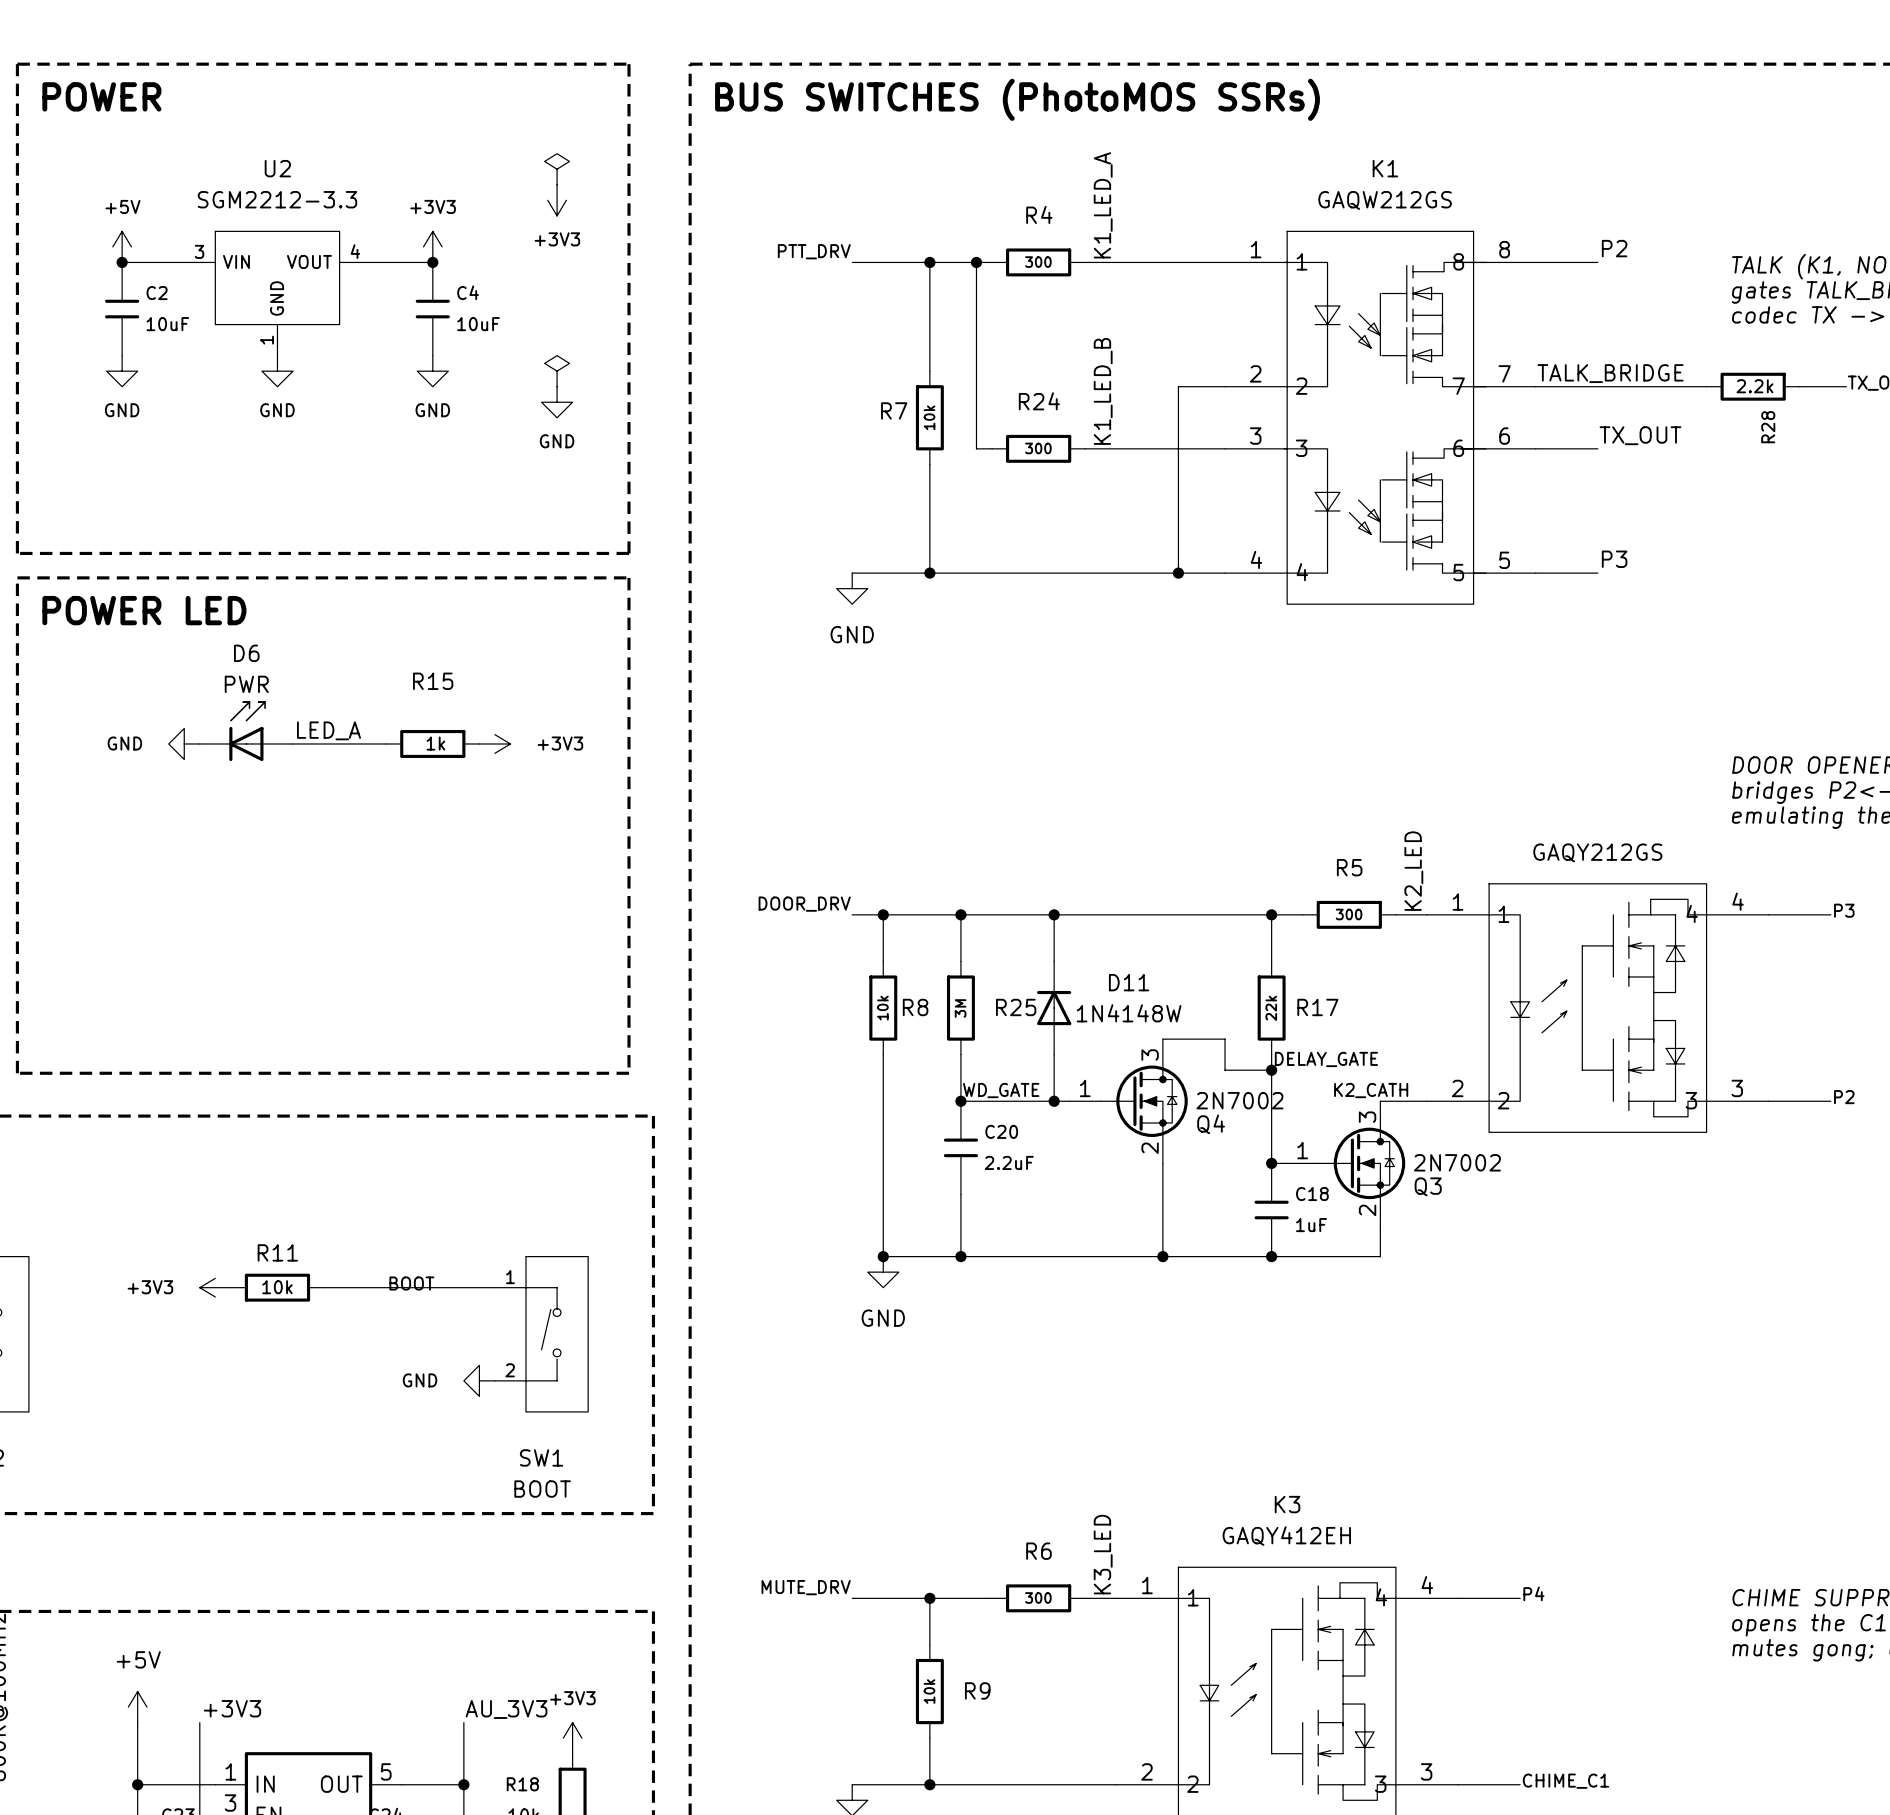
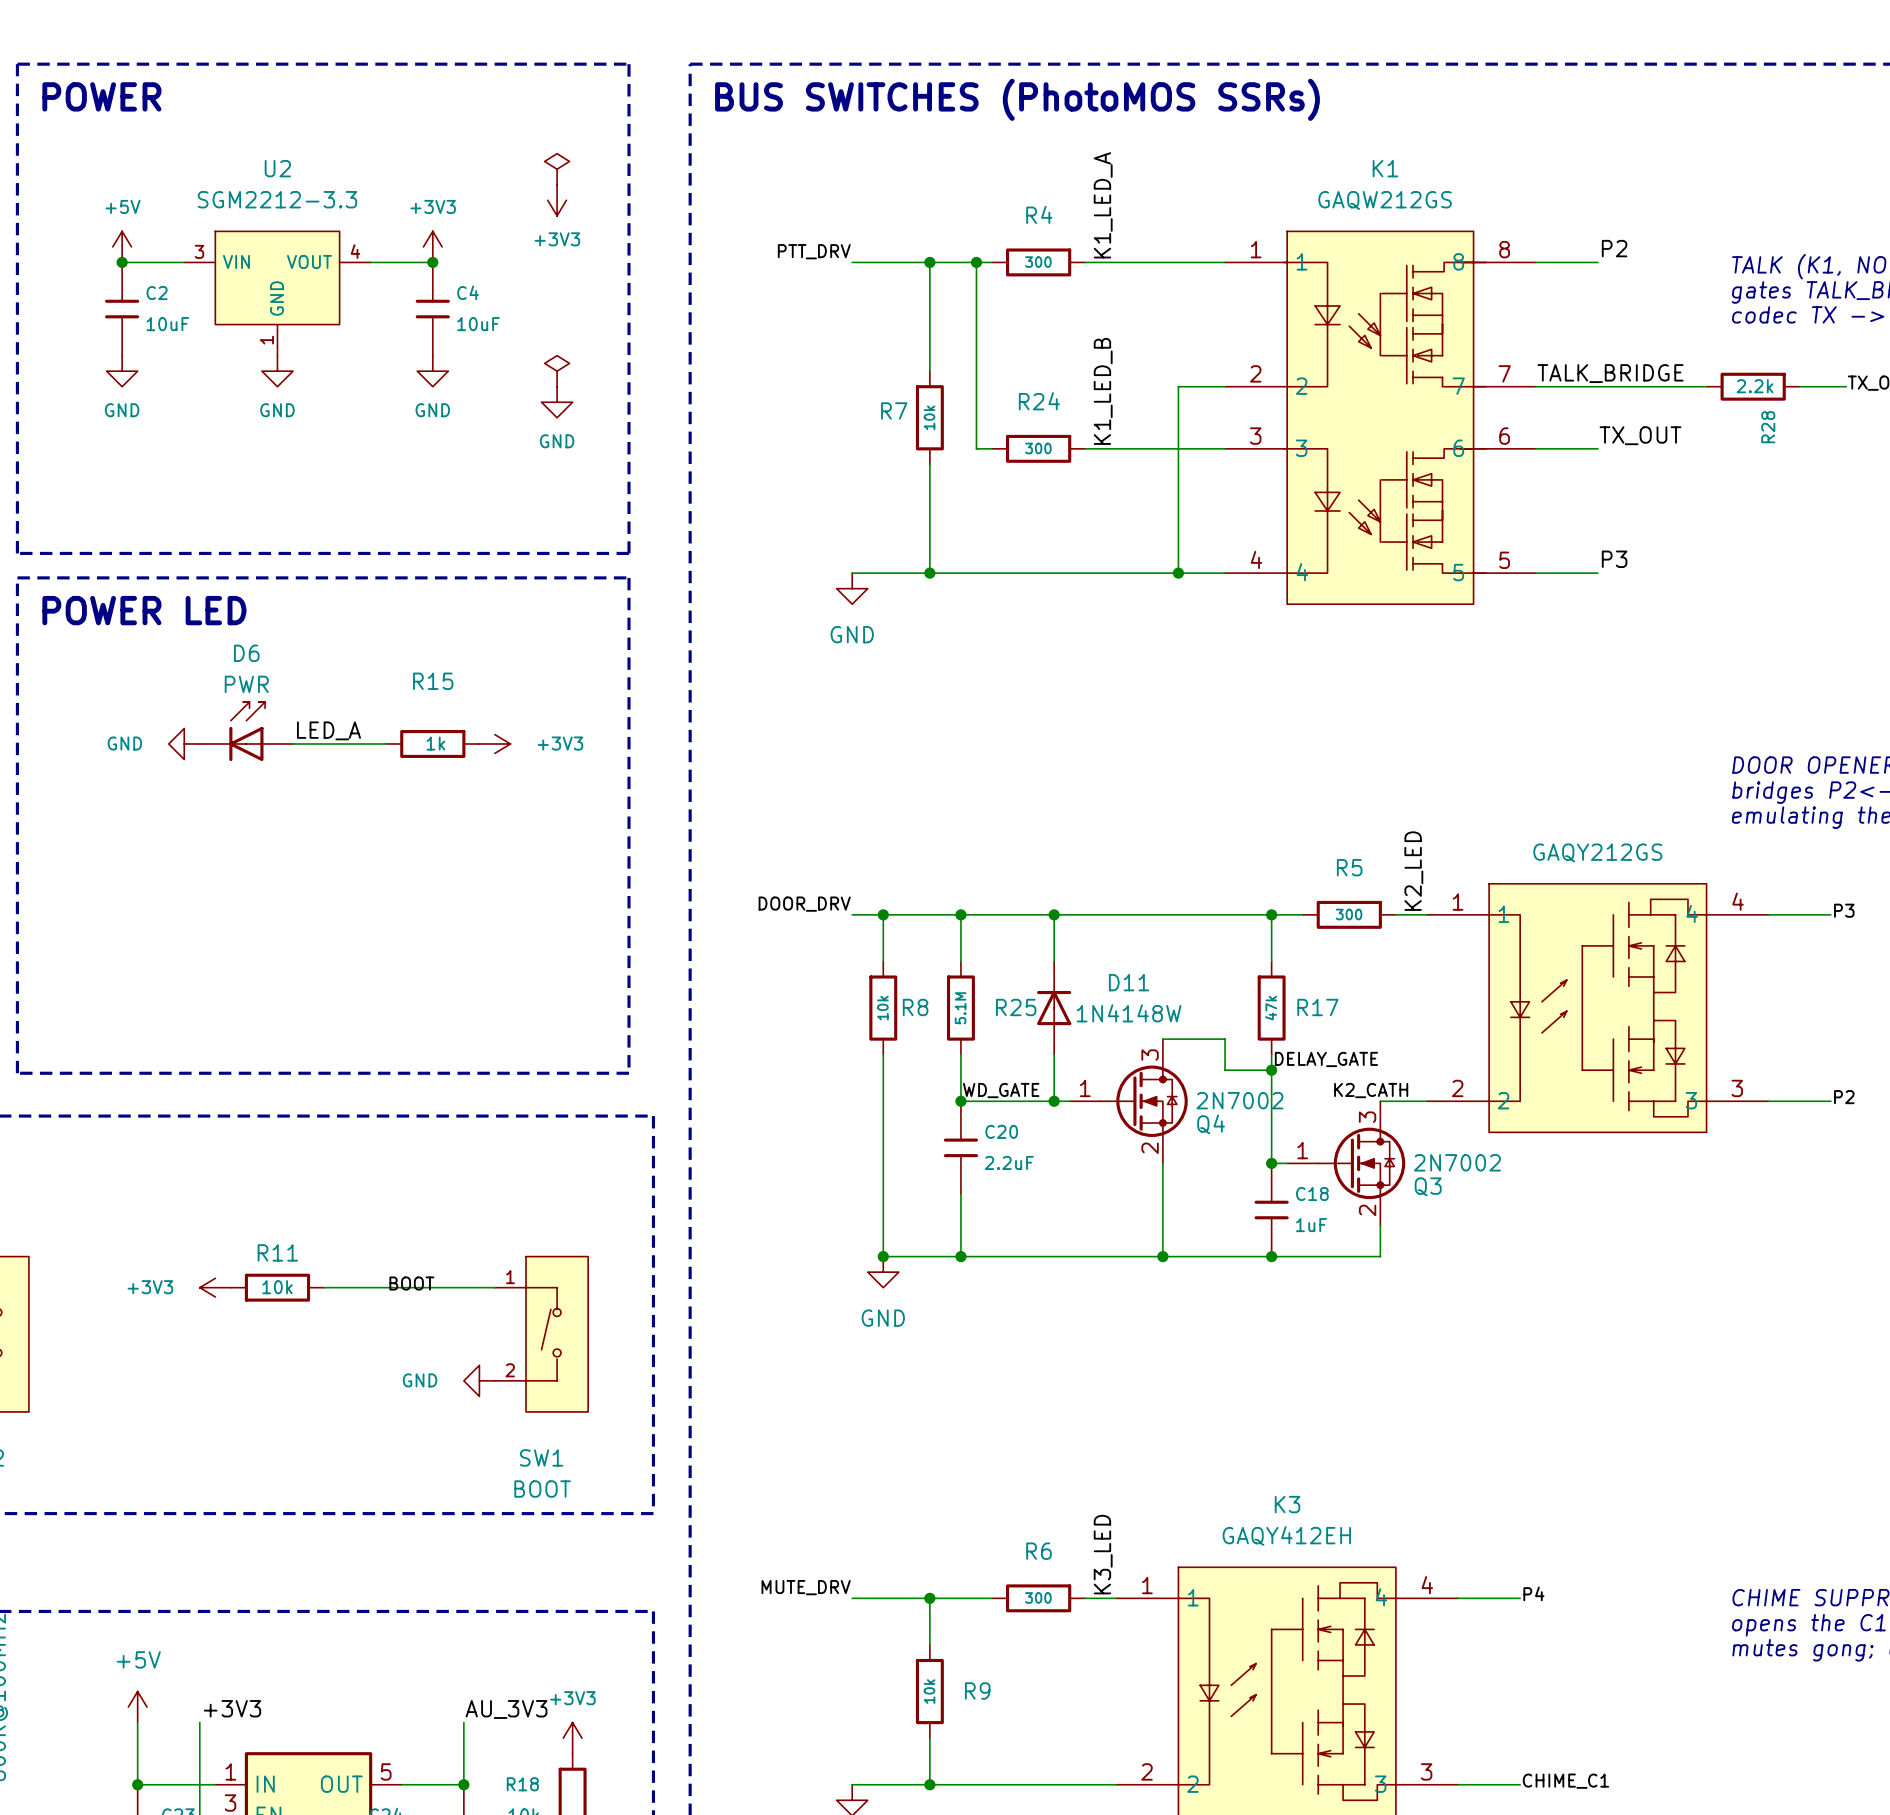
R25 value: 3M (960, 1008) -> 5.1M (960, 1008)
R17 value: 22k (1271, 1008) -> 47k (1271, 1008)

